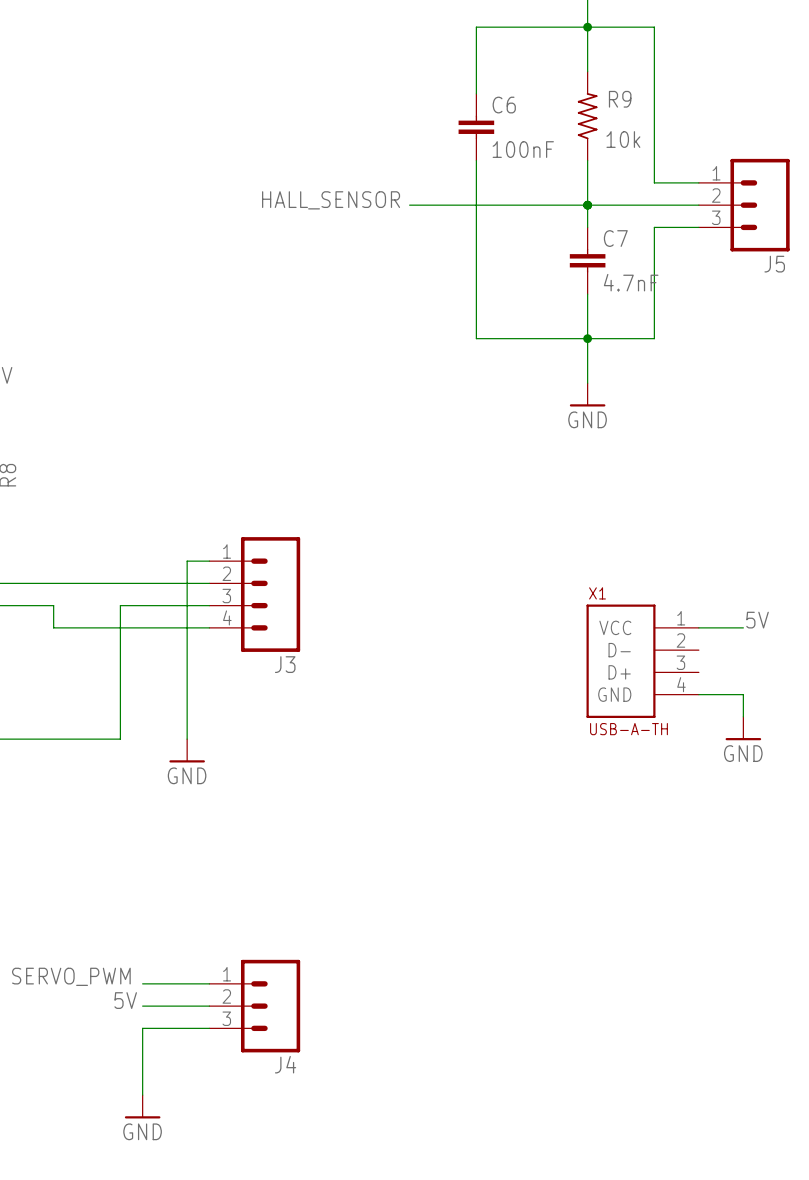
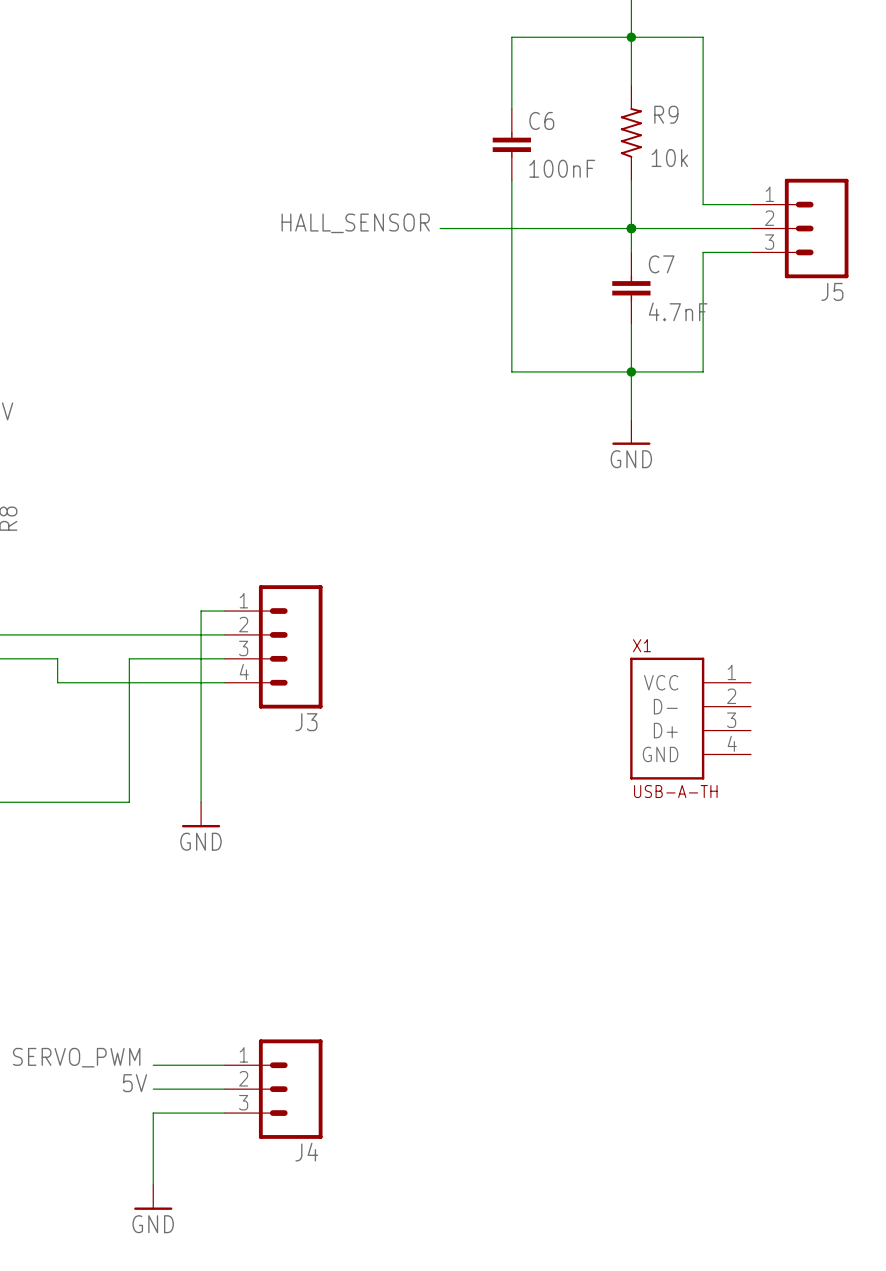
label: 5V (757, 620) -> none
wire: (698, 627) (743, 627) -> none
wire: (698, 694) (743, 694) (743, 716) -> none
power symbol: GND (743, 728) -> none

